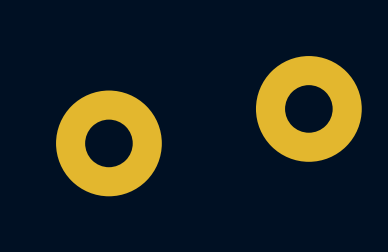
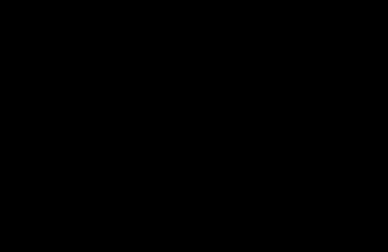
part: (308, 108) -> none
part: (108, 143) -> none

